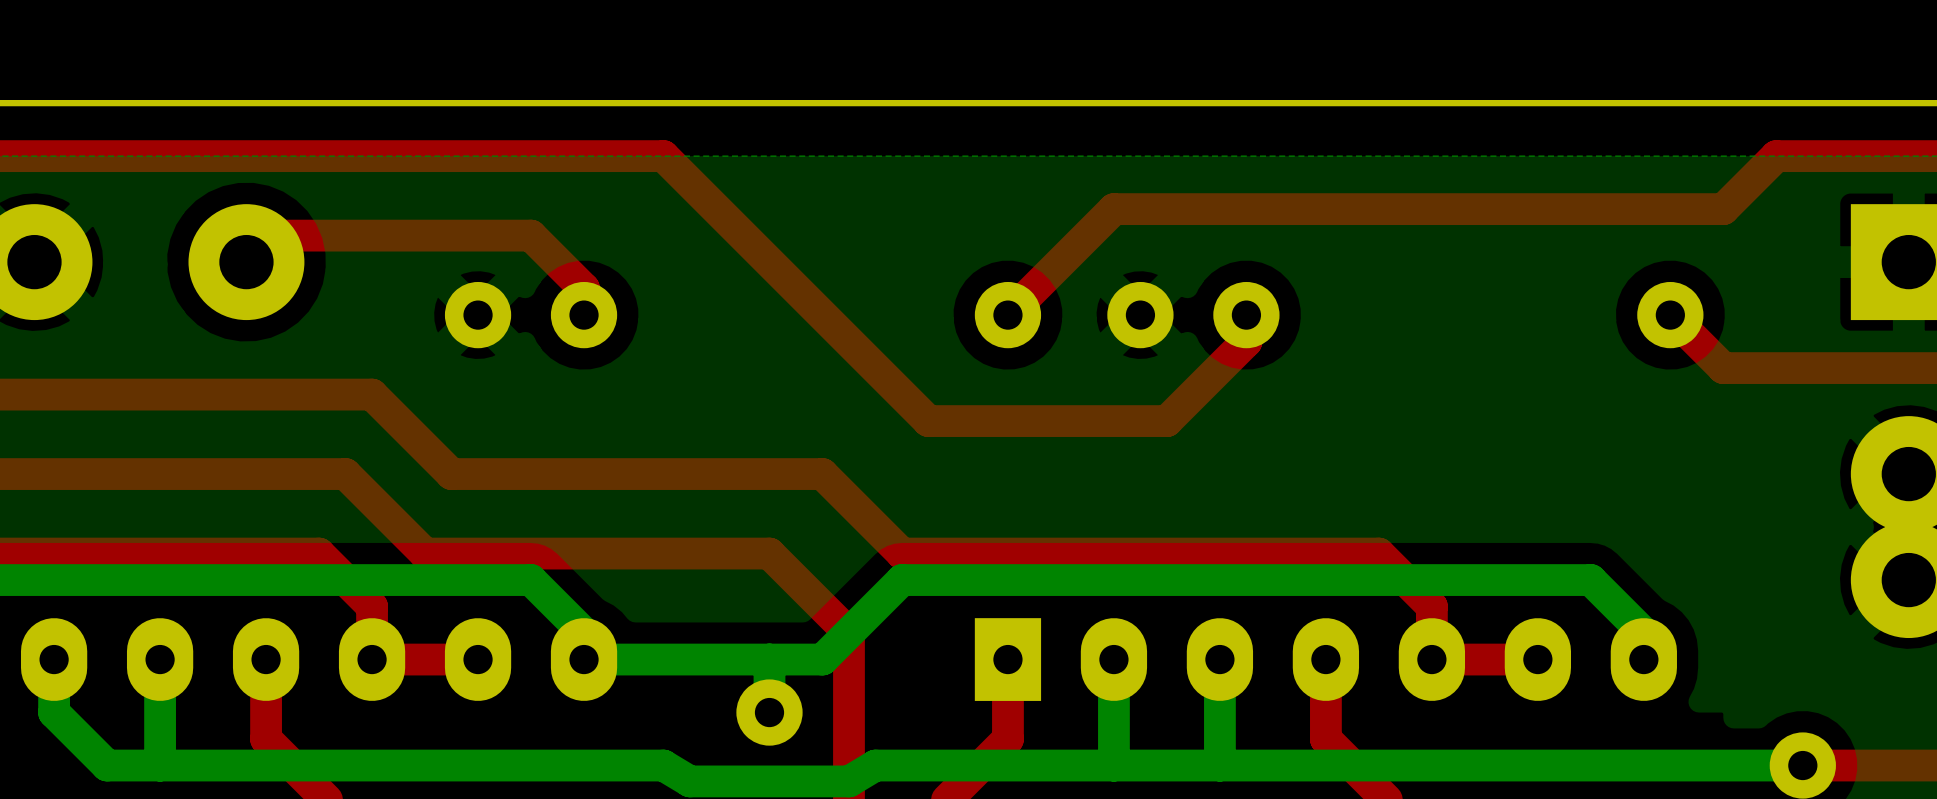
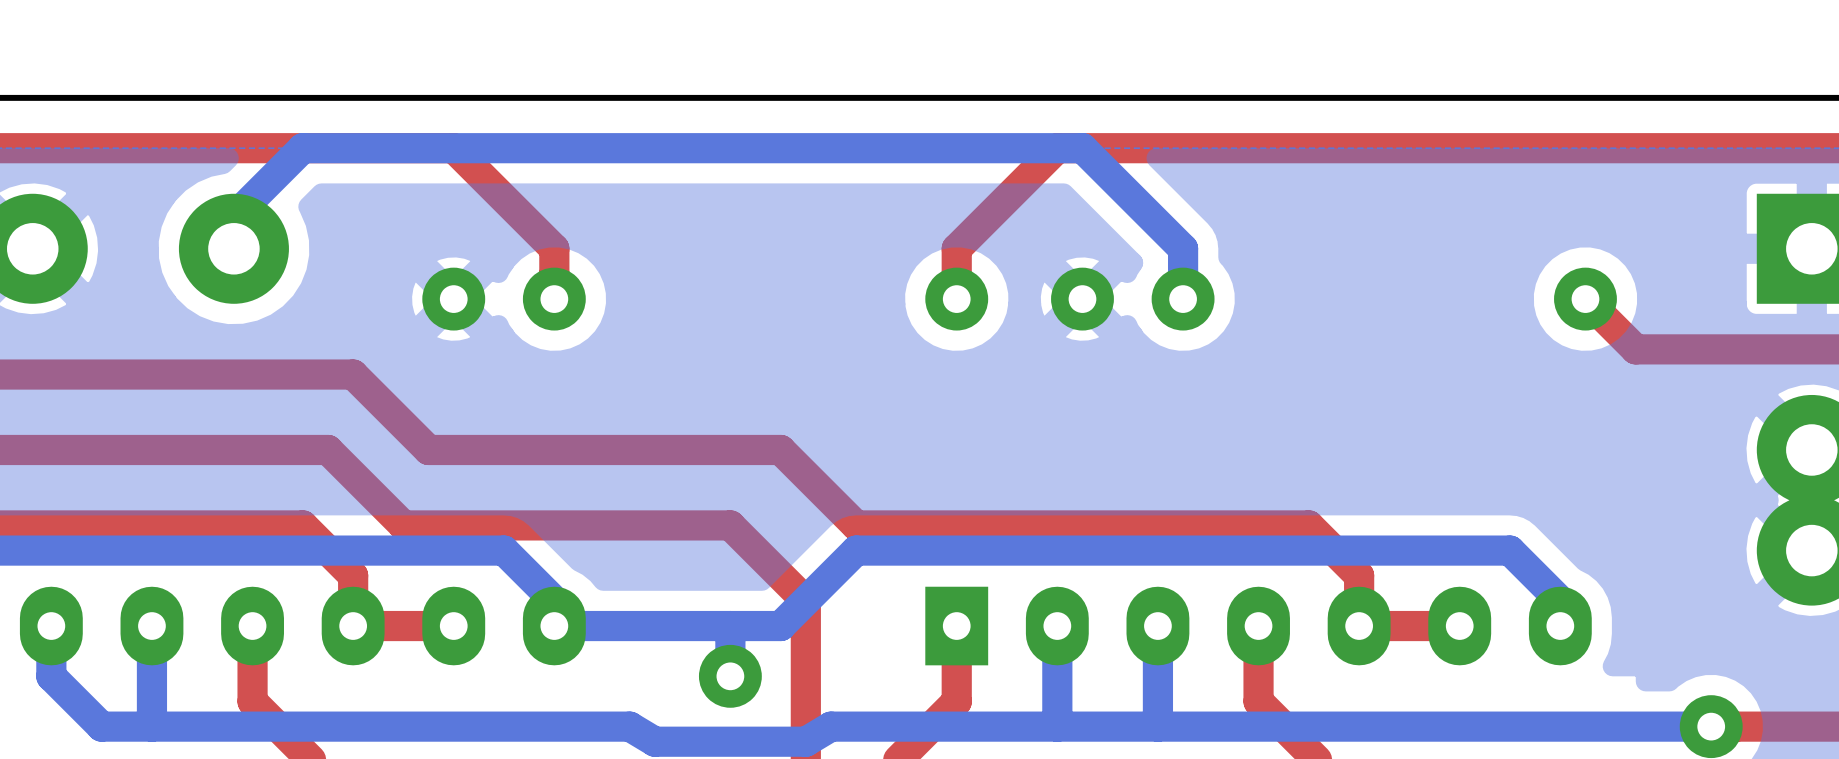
top track: (478, 156) (663, 156) (928, 421) (1166, 421) (1246, 341) (1246, 315) -> none
top track: (1776, 156) (1723, 209) (1113, 209) (1007, 315) -> (1686, 148) (1057, 148) (956, 248) (956, 299)
bottom track: none -> (233, 248) (233, 217) (302, 148) (1082, 148) (1183, 248) (1183, 299)
top track: (246, 262) (272, 235) (531, 235) (584, 288) -> (453, 148) (554, 248) (554, 273)

